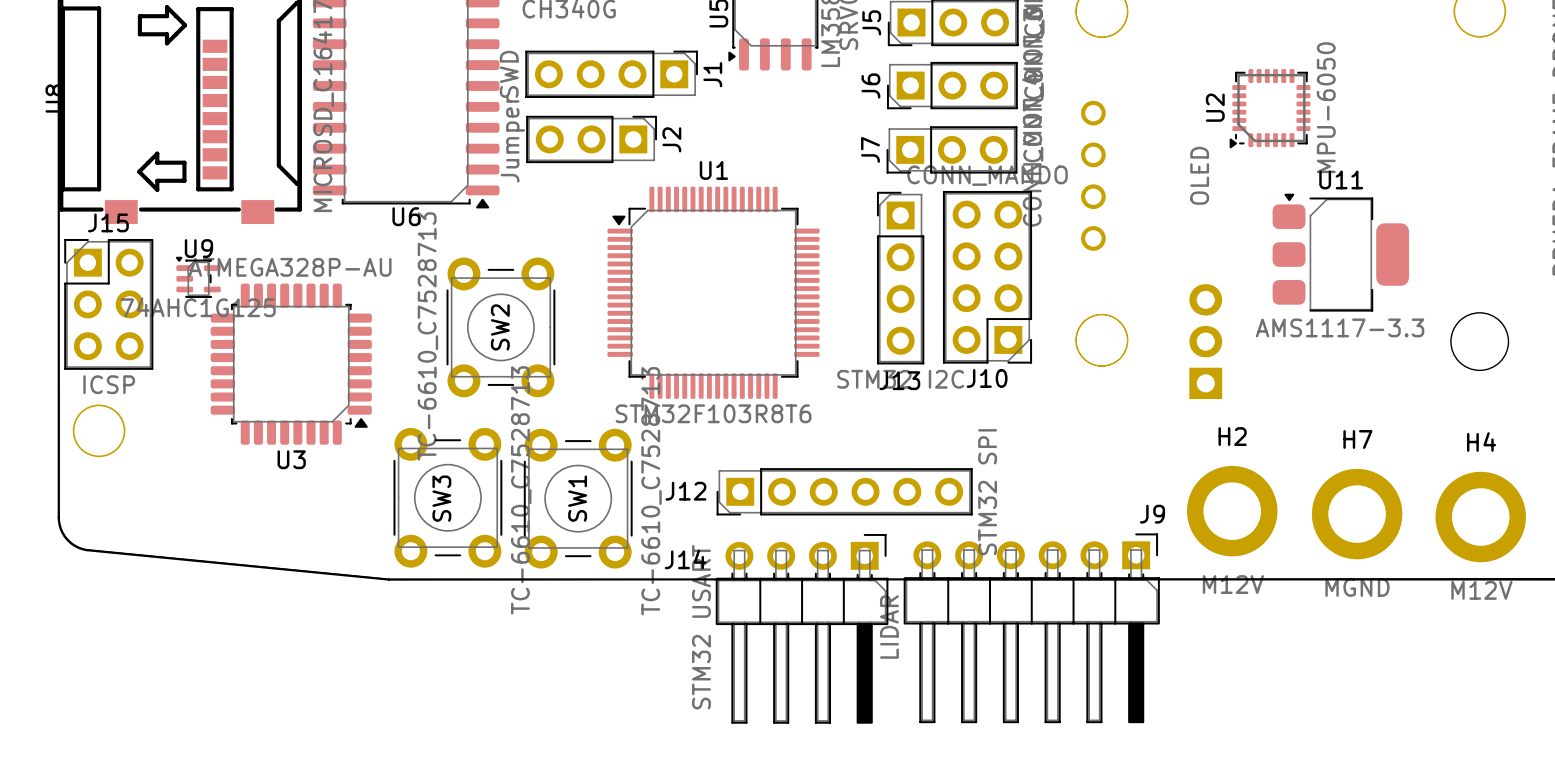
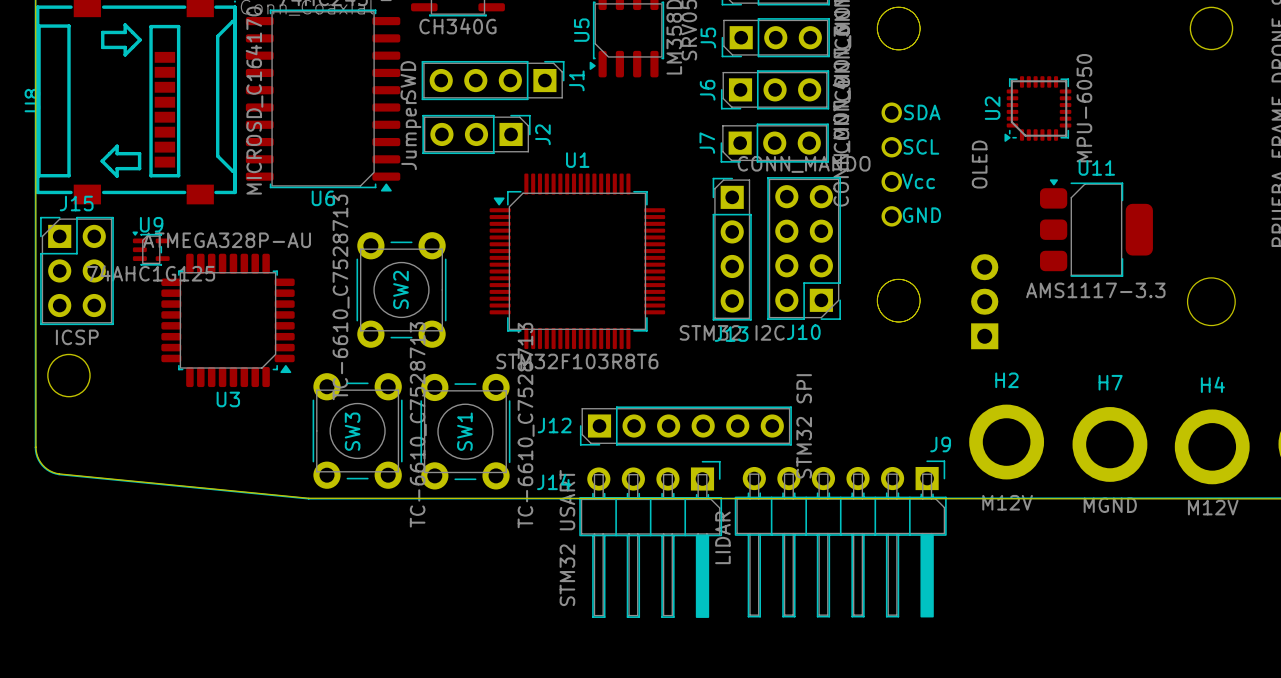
part text: none -> SDA (922, 112)
part text: none -> SCL (921, 146)
part text: none -> Vcc (918, 181)
part text: none -> GND (921, 215)

